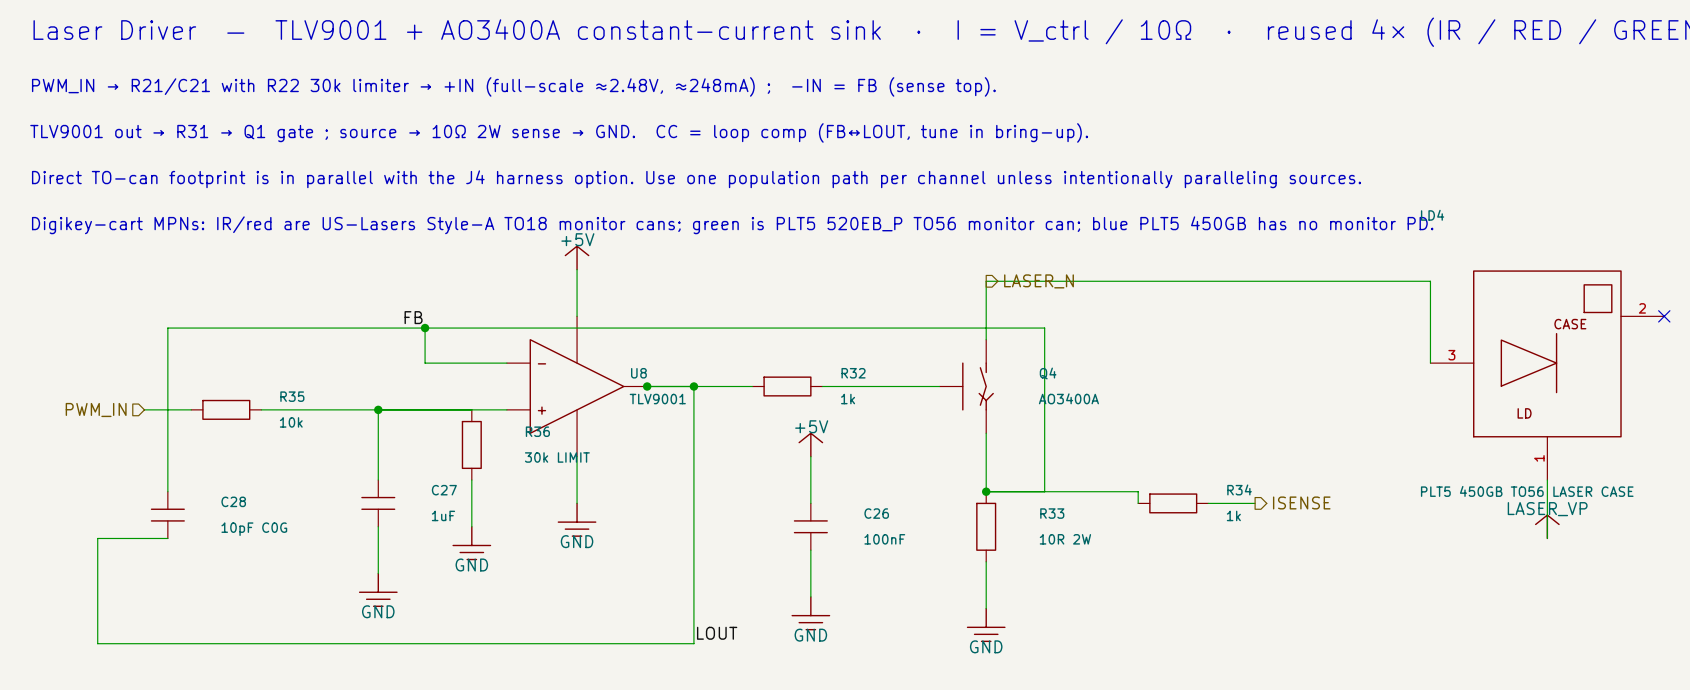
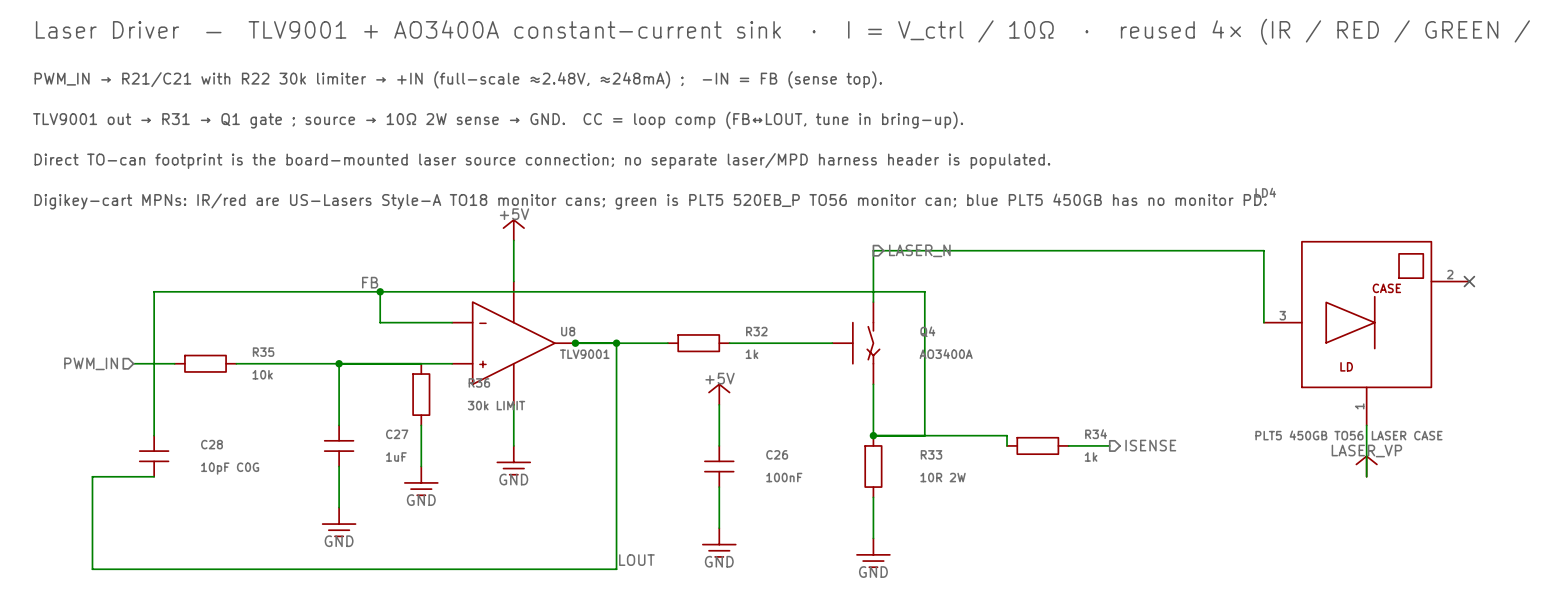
text: Direct TO-can footprint is in parallel with the J4 harness option. Use one population path per channel unless intentionally paralleling sources. (696, 179) -> Direct TO-can footprint is the board-mounted laser source connection; no separate laser/MPD harness header is populated. (542, 161)

